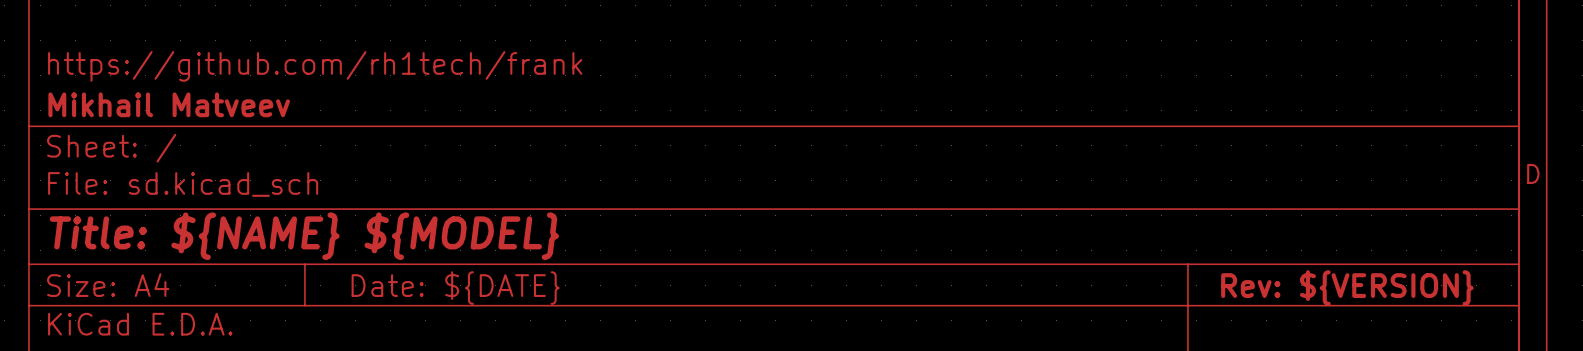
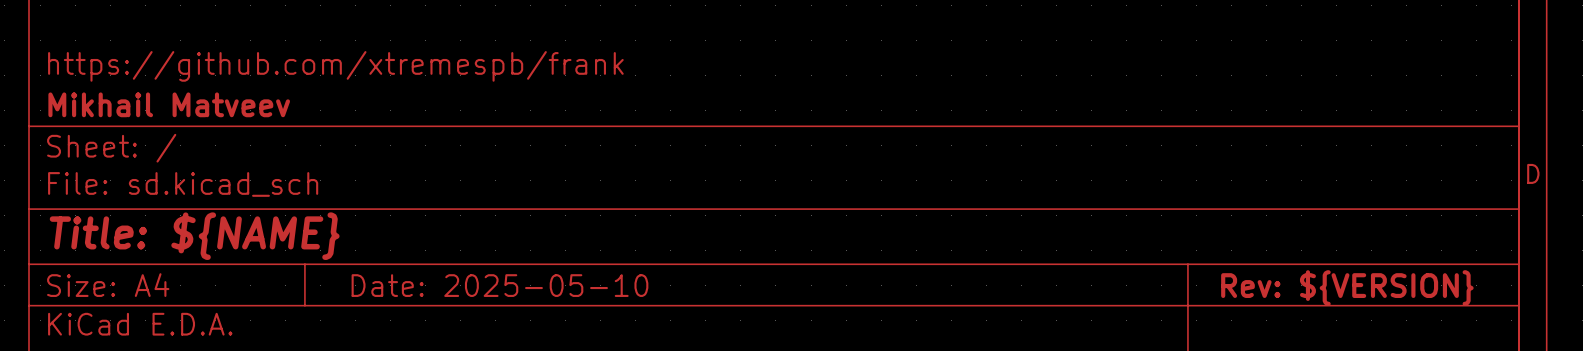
title block: https://github.com/rh1tech/frank (315, 66) -> https://github.com/xtremespb/frank (335, 66)
title block: Title: ${NAME} ${MODEL} (304, 236) -> Title: ${NAME} (194, 236)
title block: Date: ${DATE} (455, 288) -> Date: 2025-05-10 (499, 285)

